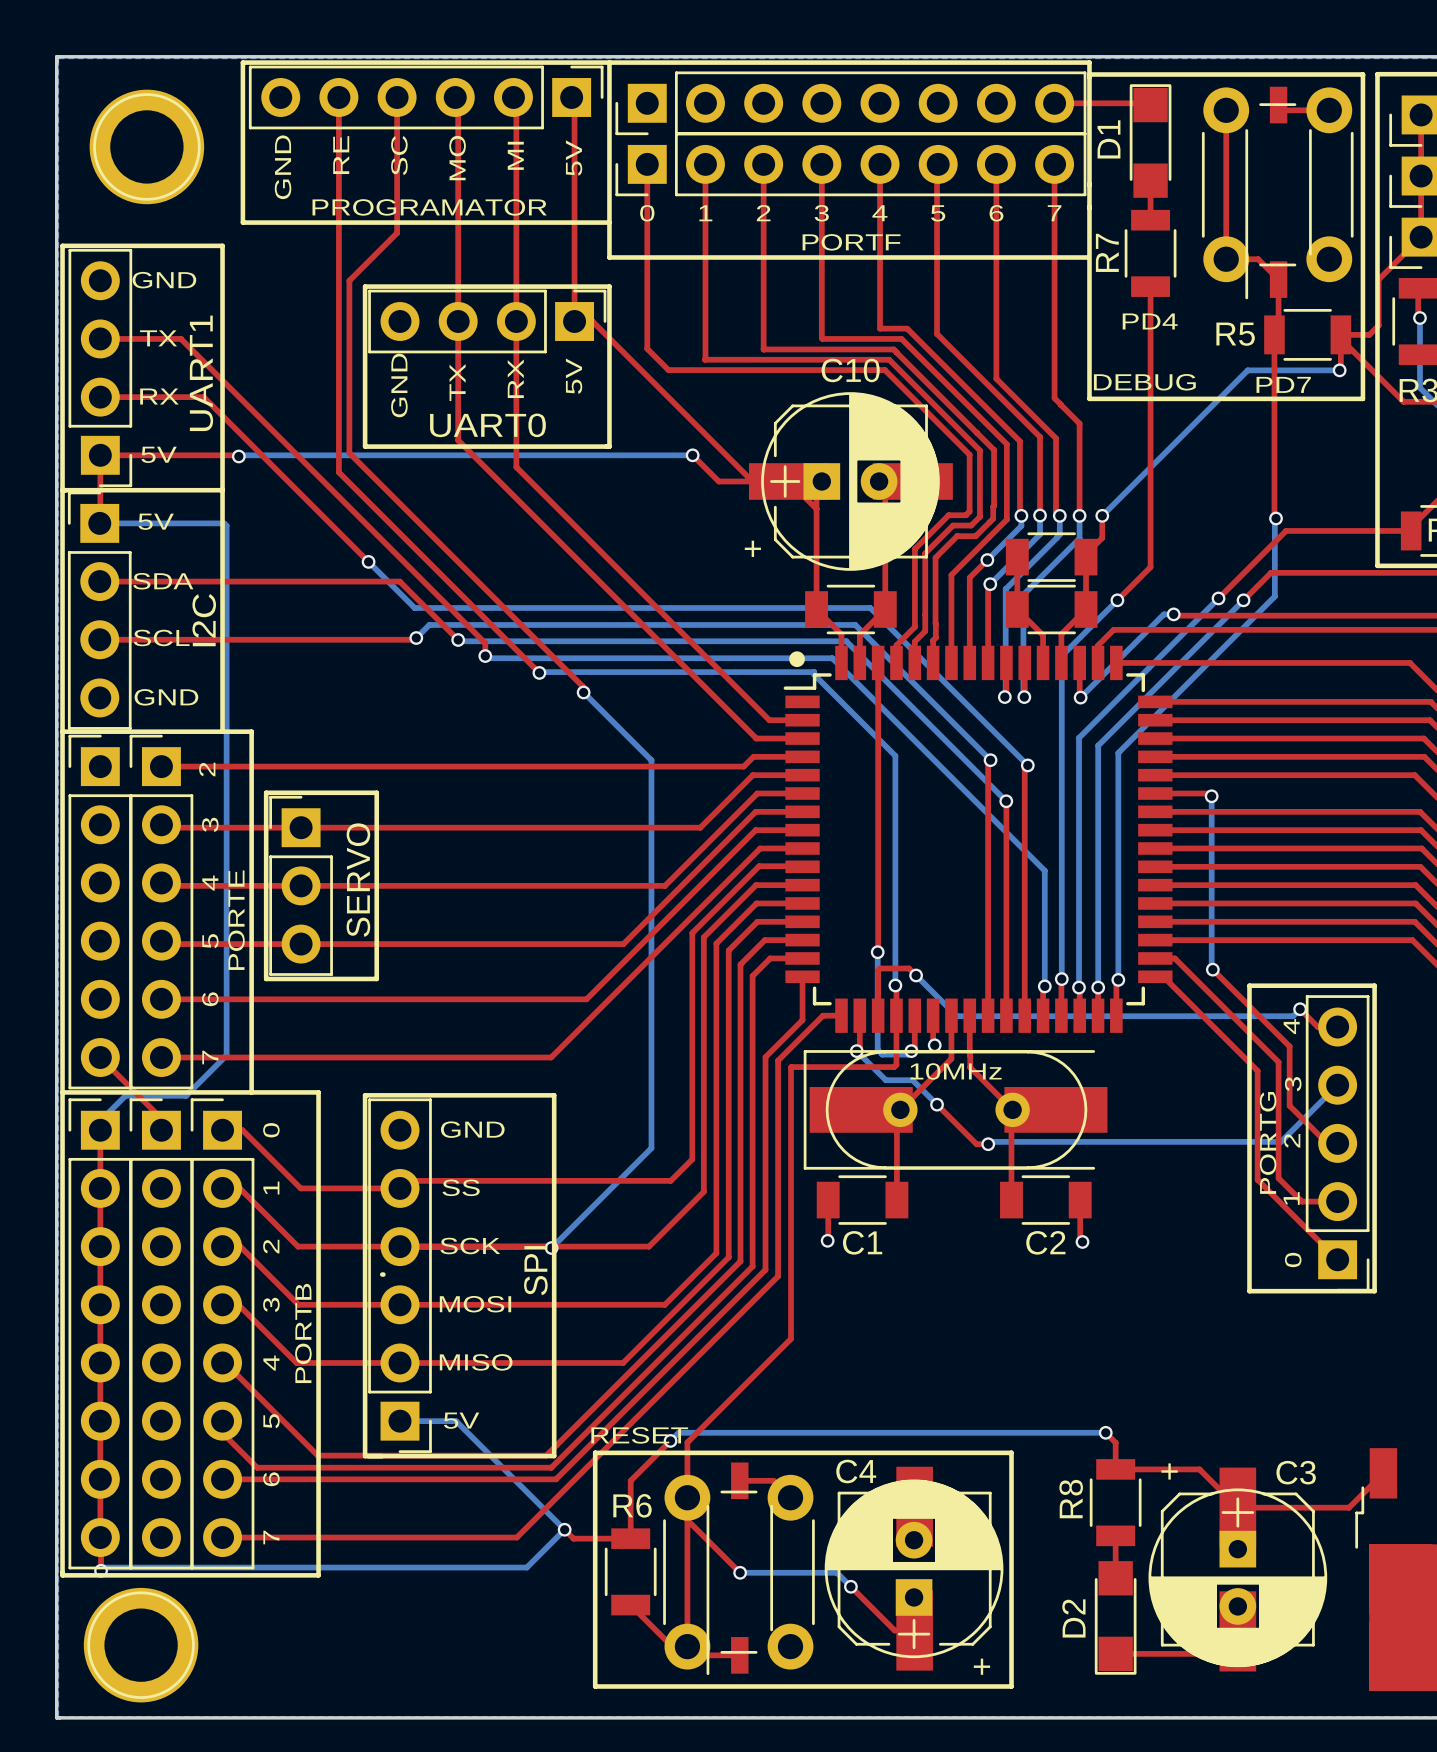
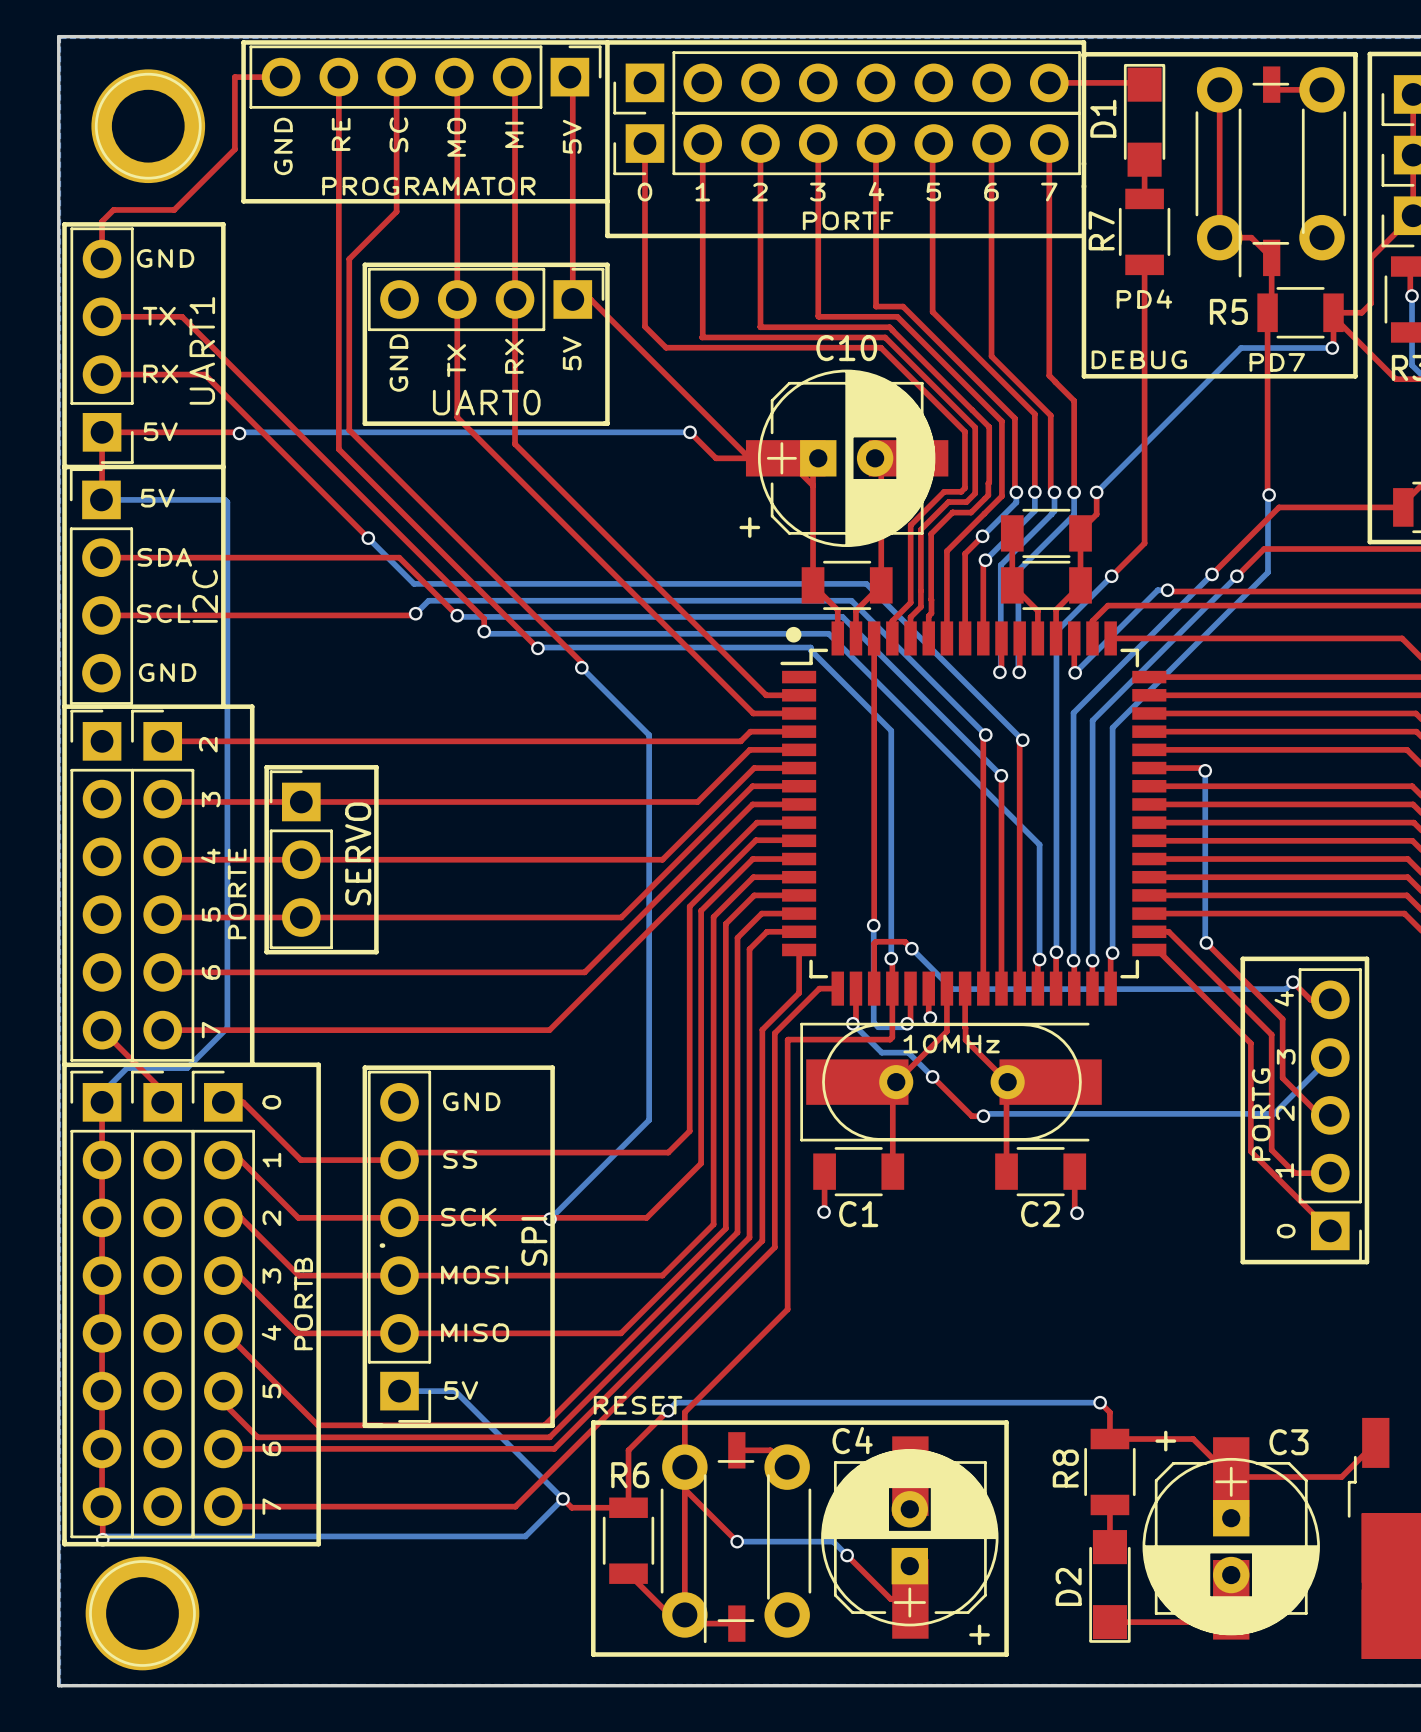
top track: none -> (281, 77) (234, 77) (234, 149) (174, 209) (113, 209) (102, 221) (102, 259)

